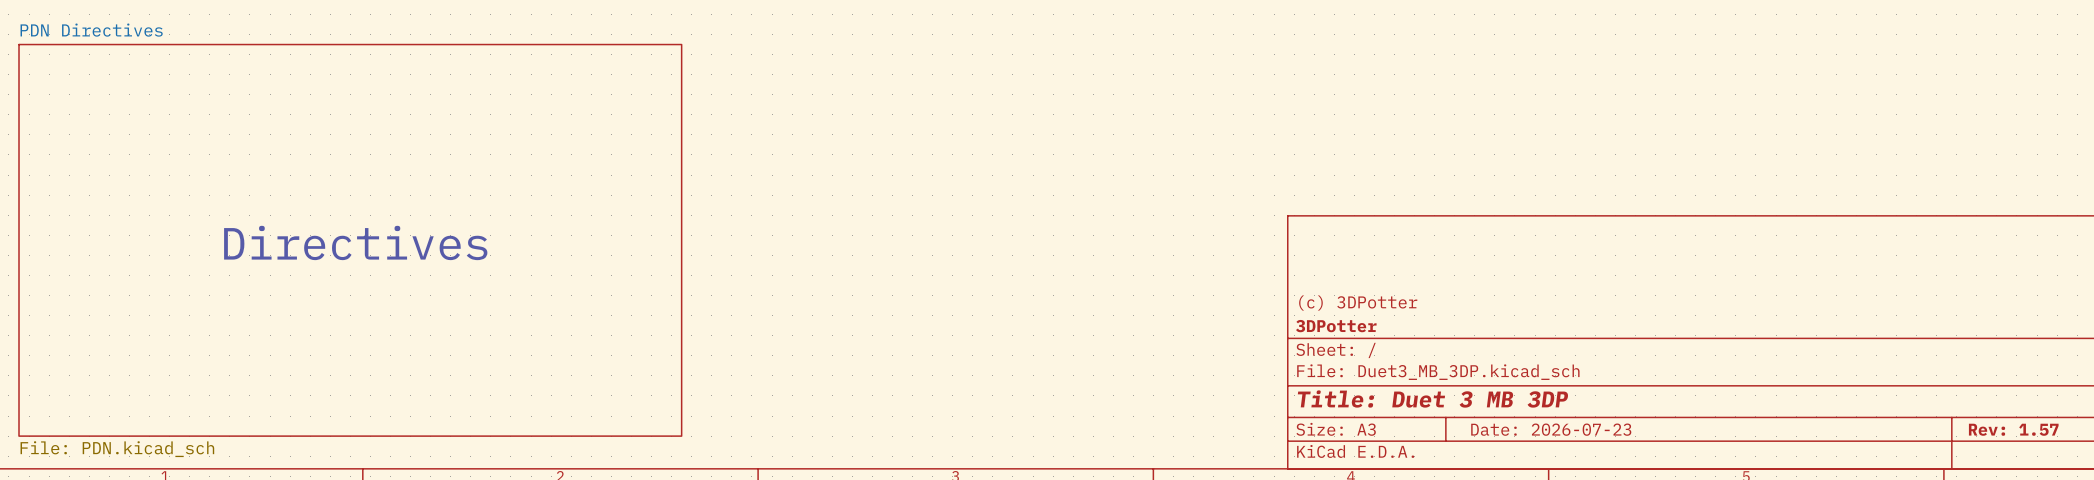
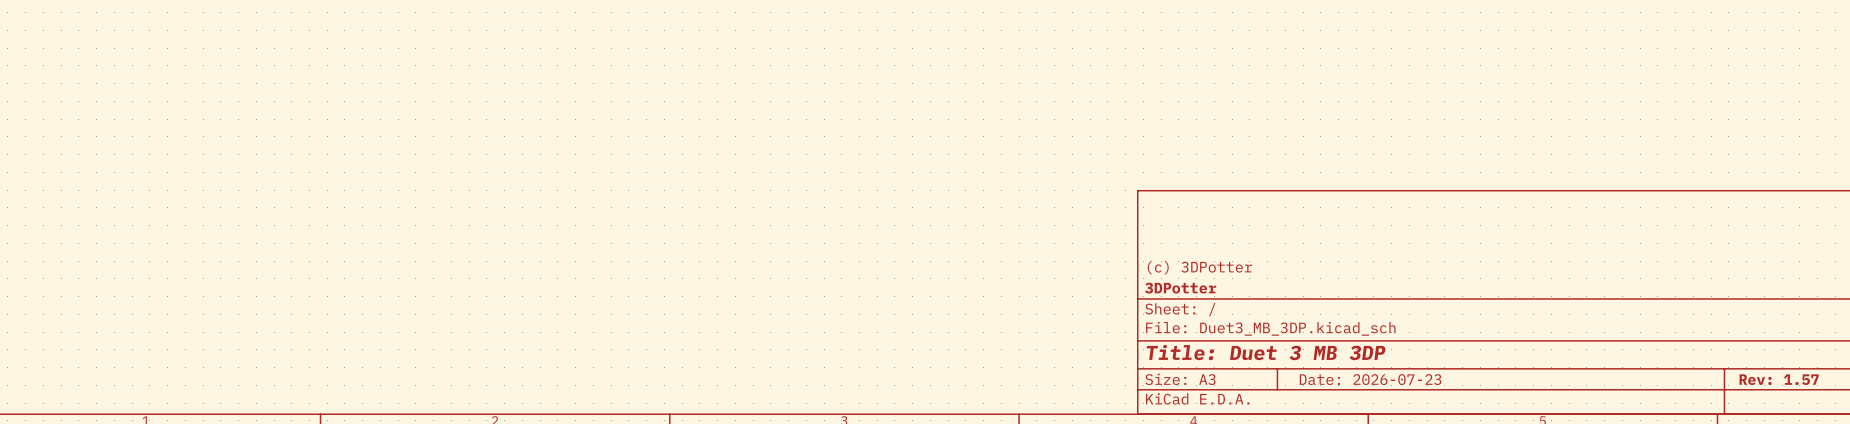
sheet PDN Directives: File: PDN.kicad_sch (350, 240) -> none
text: Directives (355, 242) -> none

